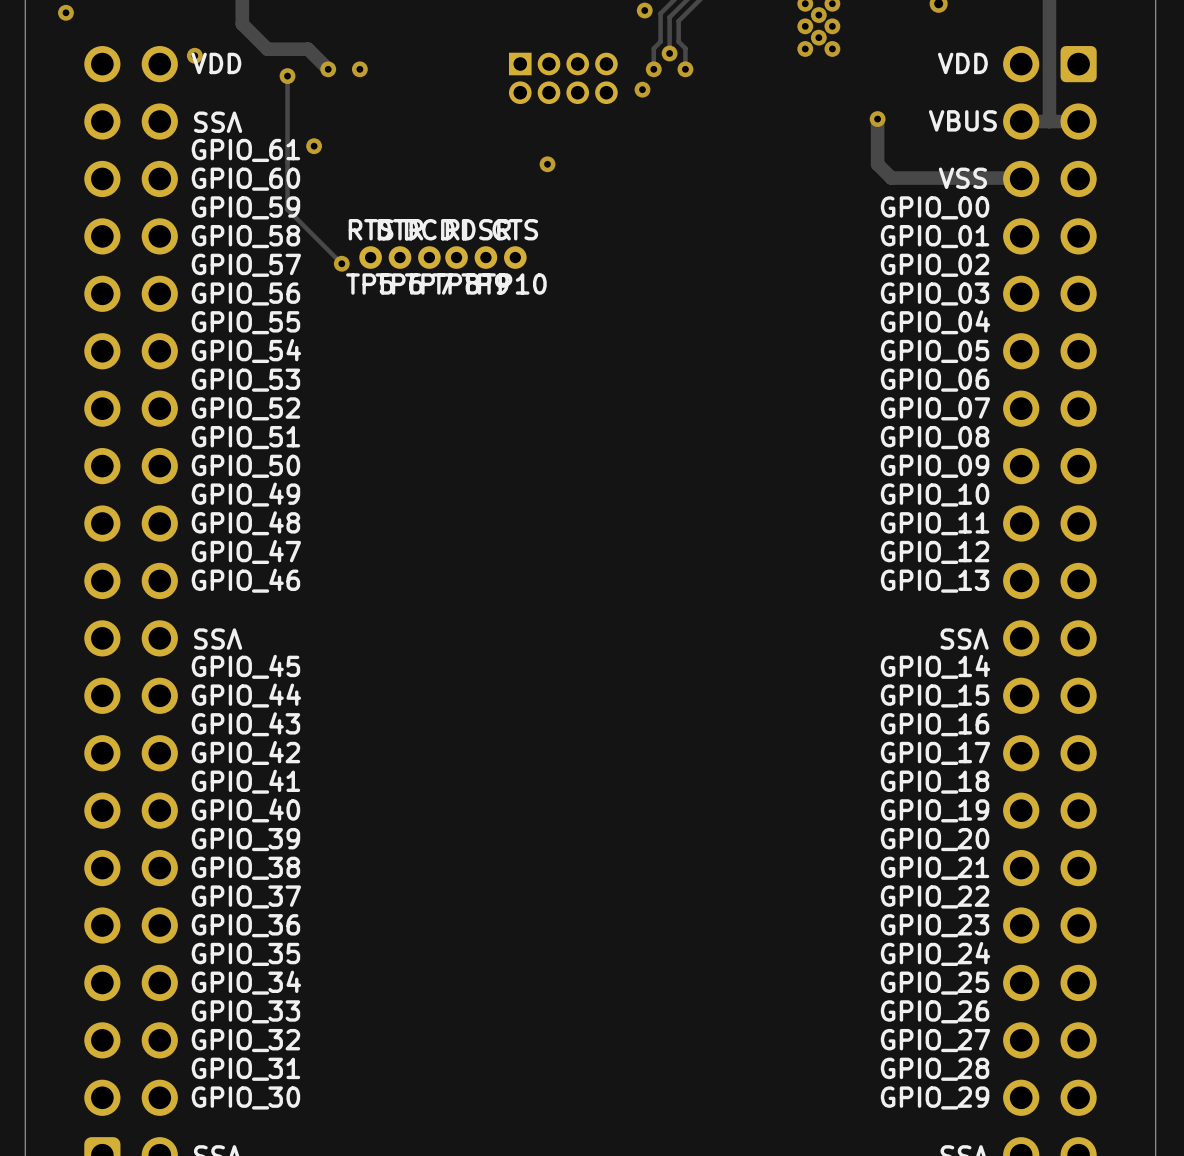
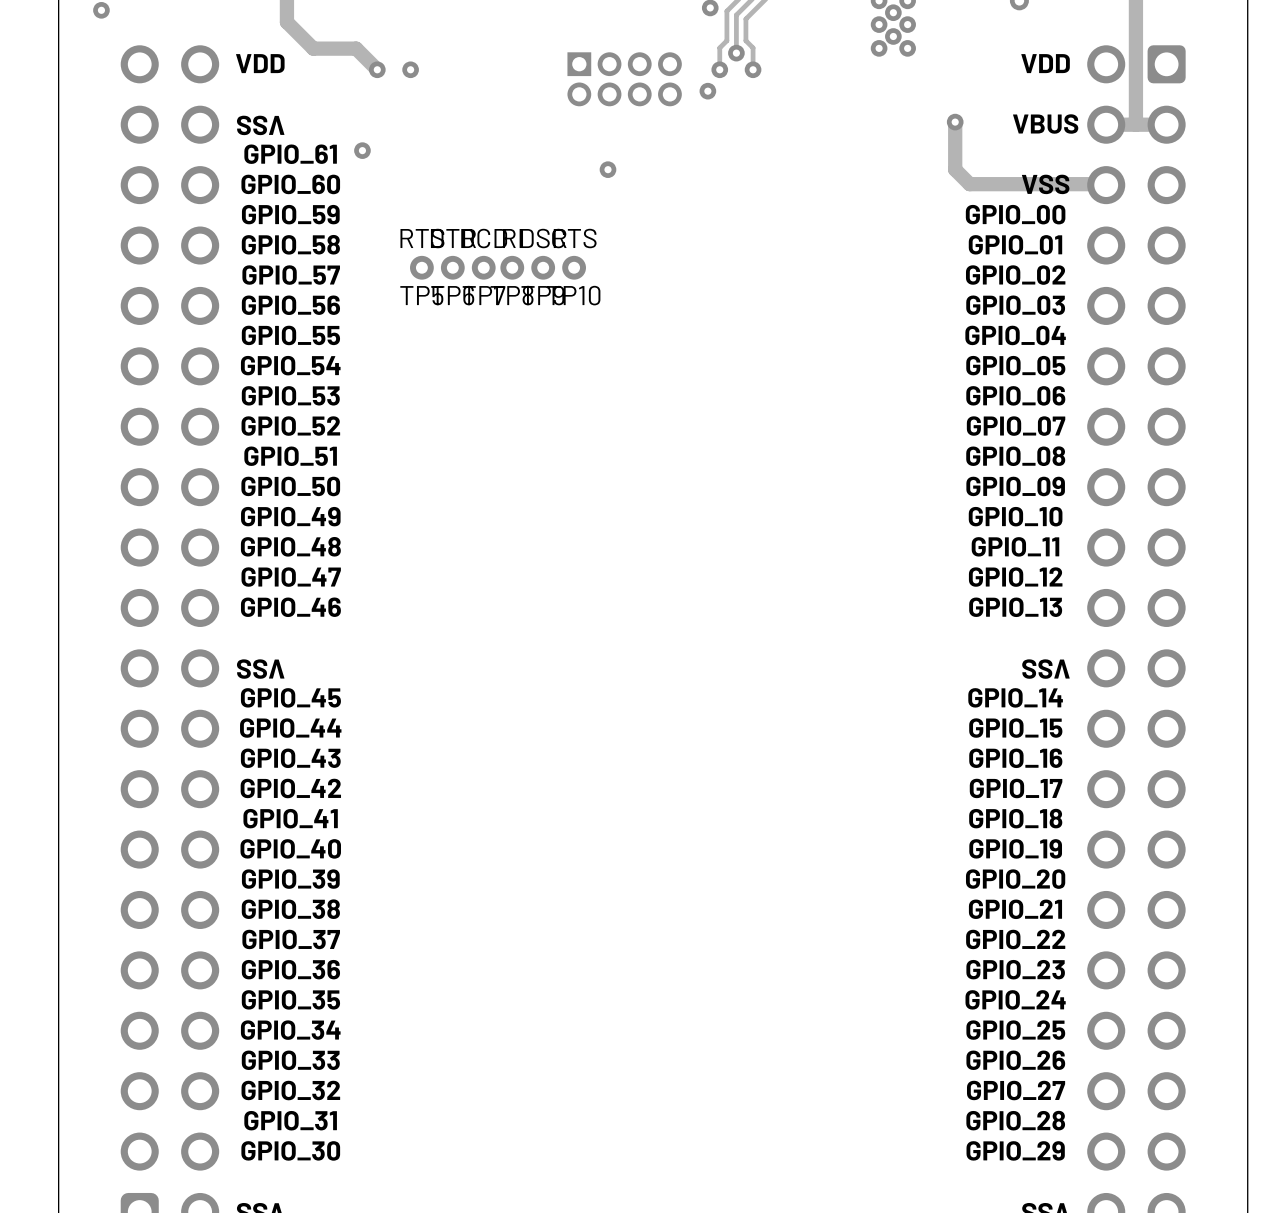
via: (194, 55) -> none
track: (287, 76) (287, 209) (341, 263) -> none
via: (287, 76) -> none
via: (341, 263) -> none

